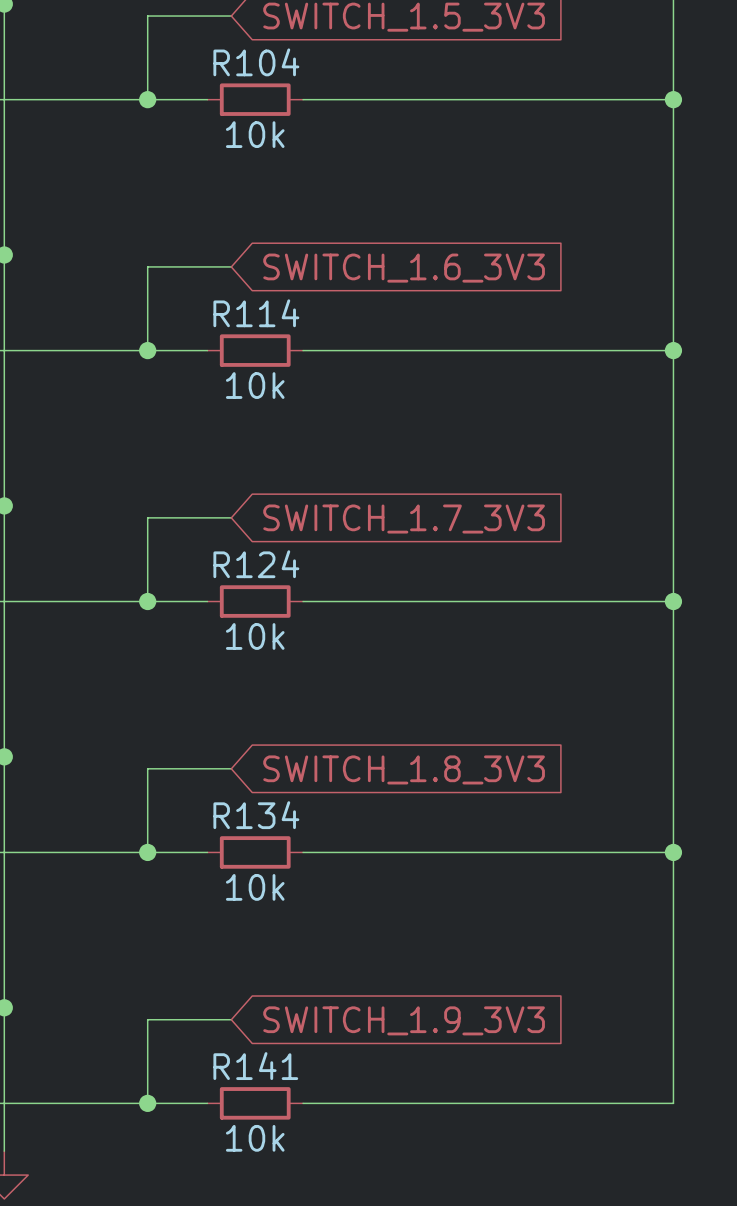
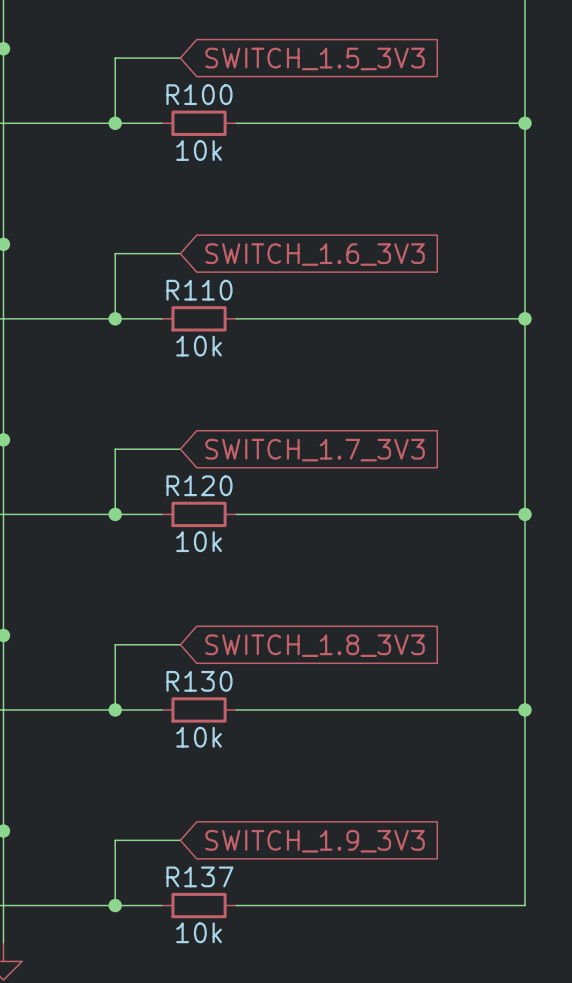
R104 name: R104 (256, 62) -> R100 (199, 94)
R114 name: R114 (256, 313) -> R110 (199, 290)
R124 name: R124 (256, 564) -> R120 (199, 485)
R134 name: R134 (256, 815) -> R130 (199, 681)
R141 name: R141 (255, 1066) -> R137 (199, 876)

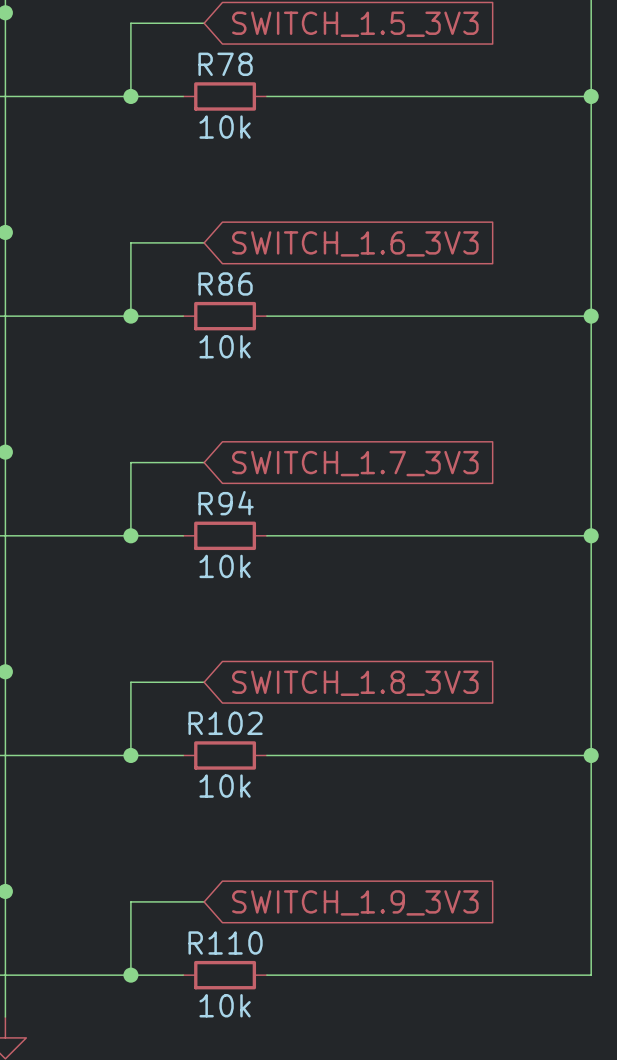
R100 name: R100 (199, 94) -> R78 (225, 64)
R110 name: R110 (199, 290) -> R86 (225, 283)
R120 name: R120 (199, 485) -> R94 (226, 503)
R130 name: R130 (199, 681) -> R102 (225, 723)
R137 name: R137 (199, 876) -> R110 (225, 942)

